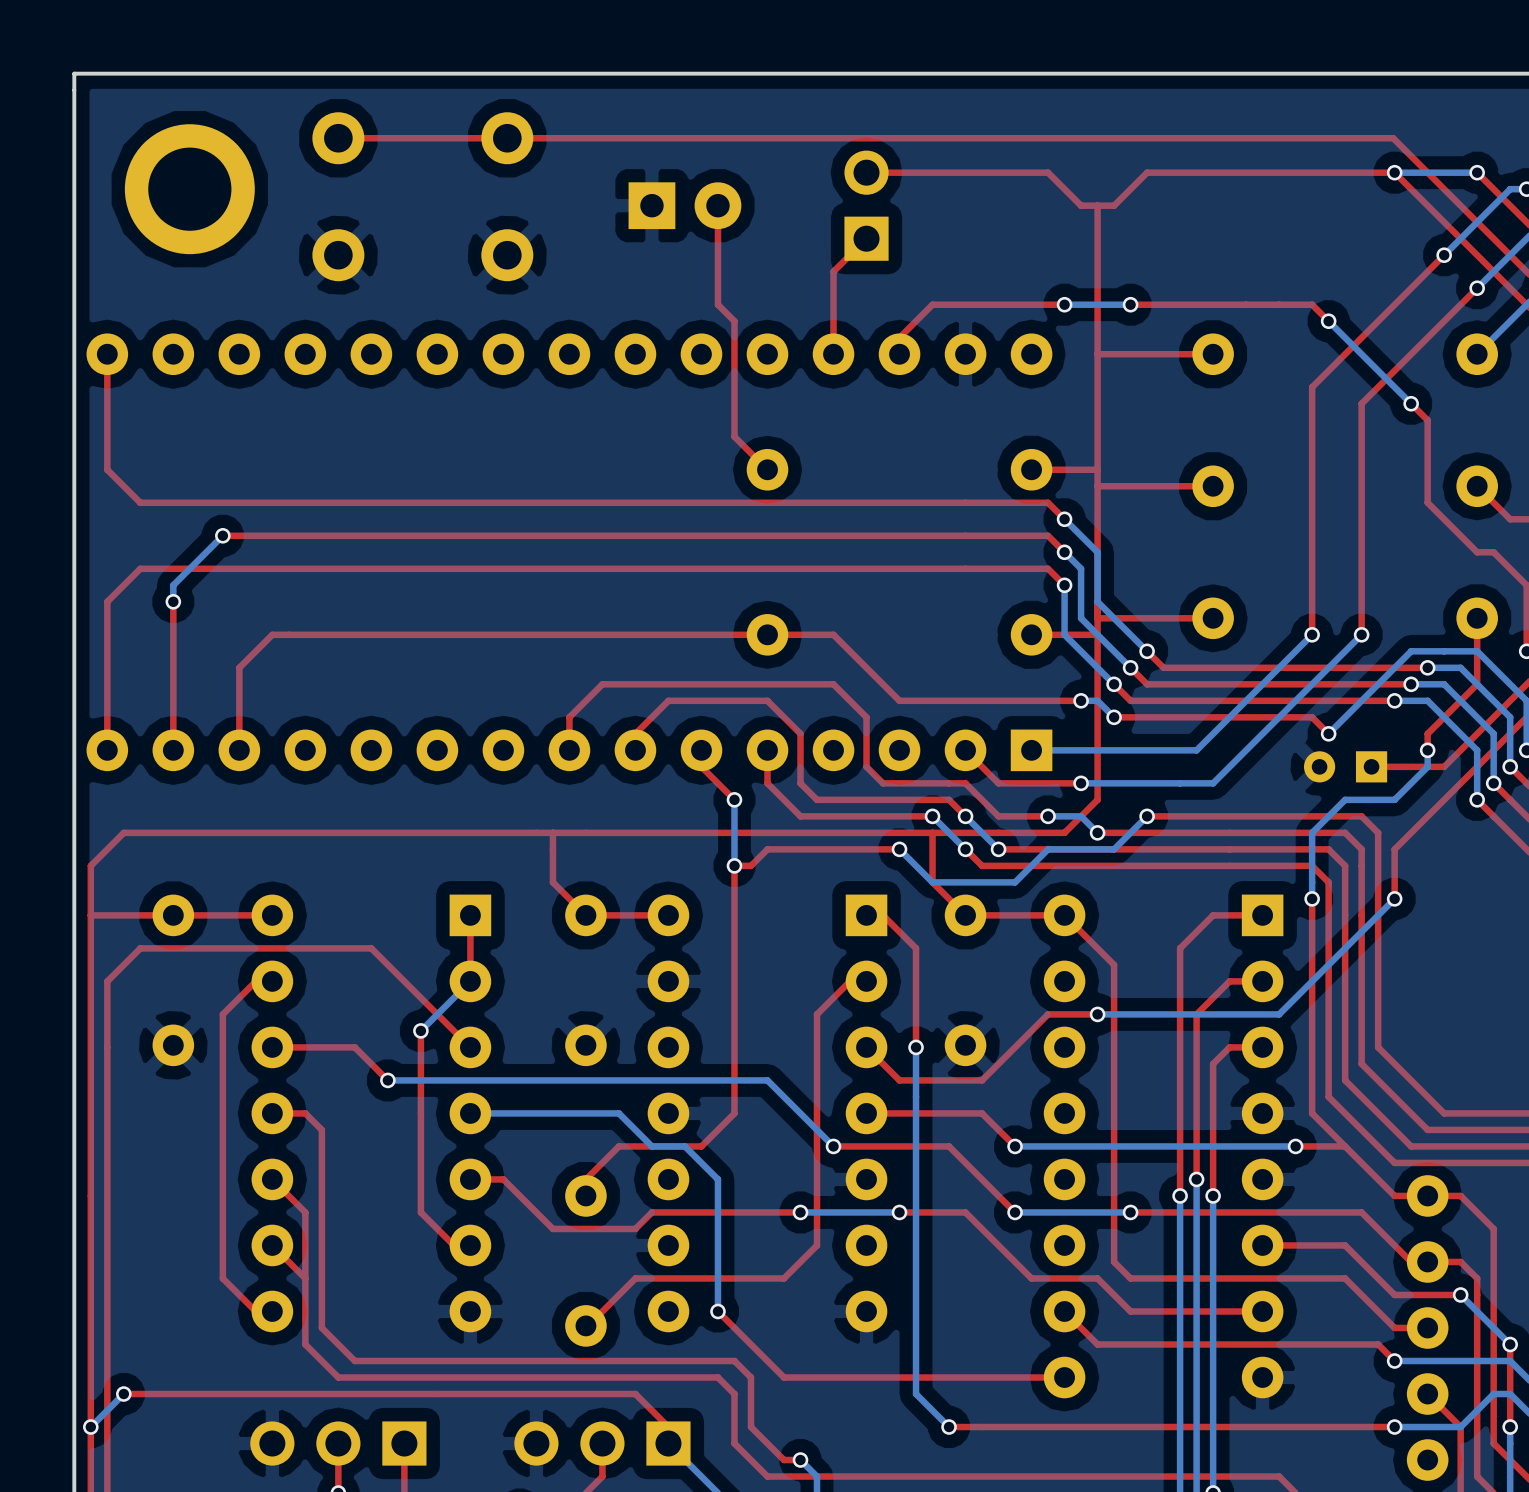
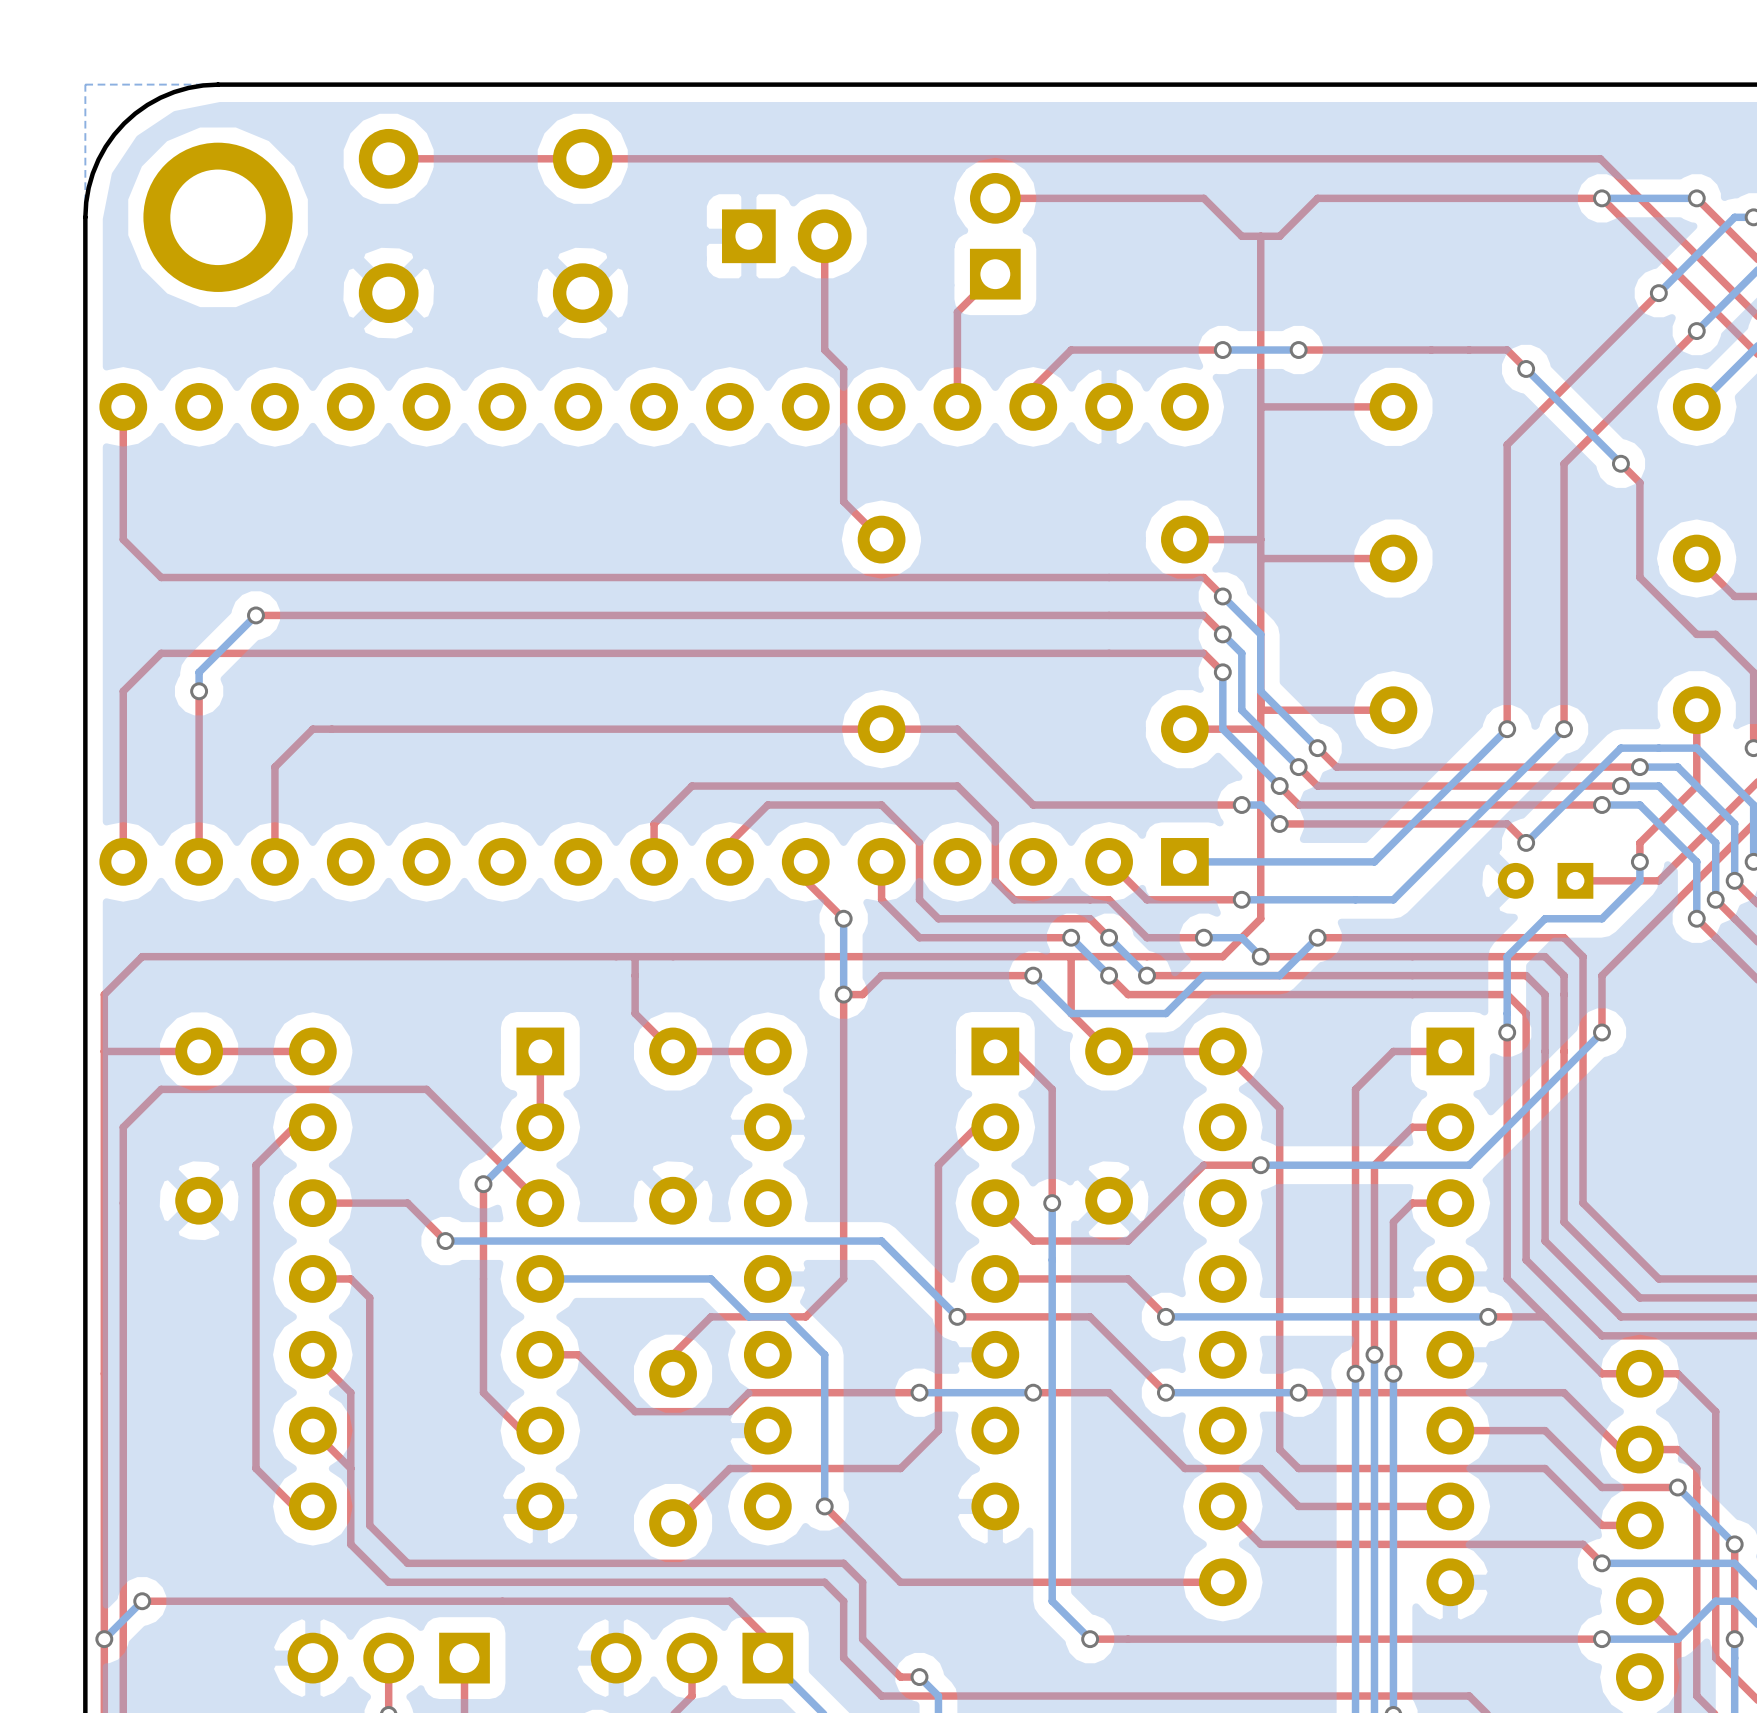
board edge: (189, 73) (74, 73) (74, 189) -> (218, 84) (188, 87) (174, 92) (147, 104) (124, 123) (105, 146) (98, 159) (88, 187) (85, 217)

